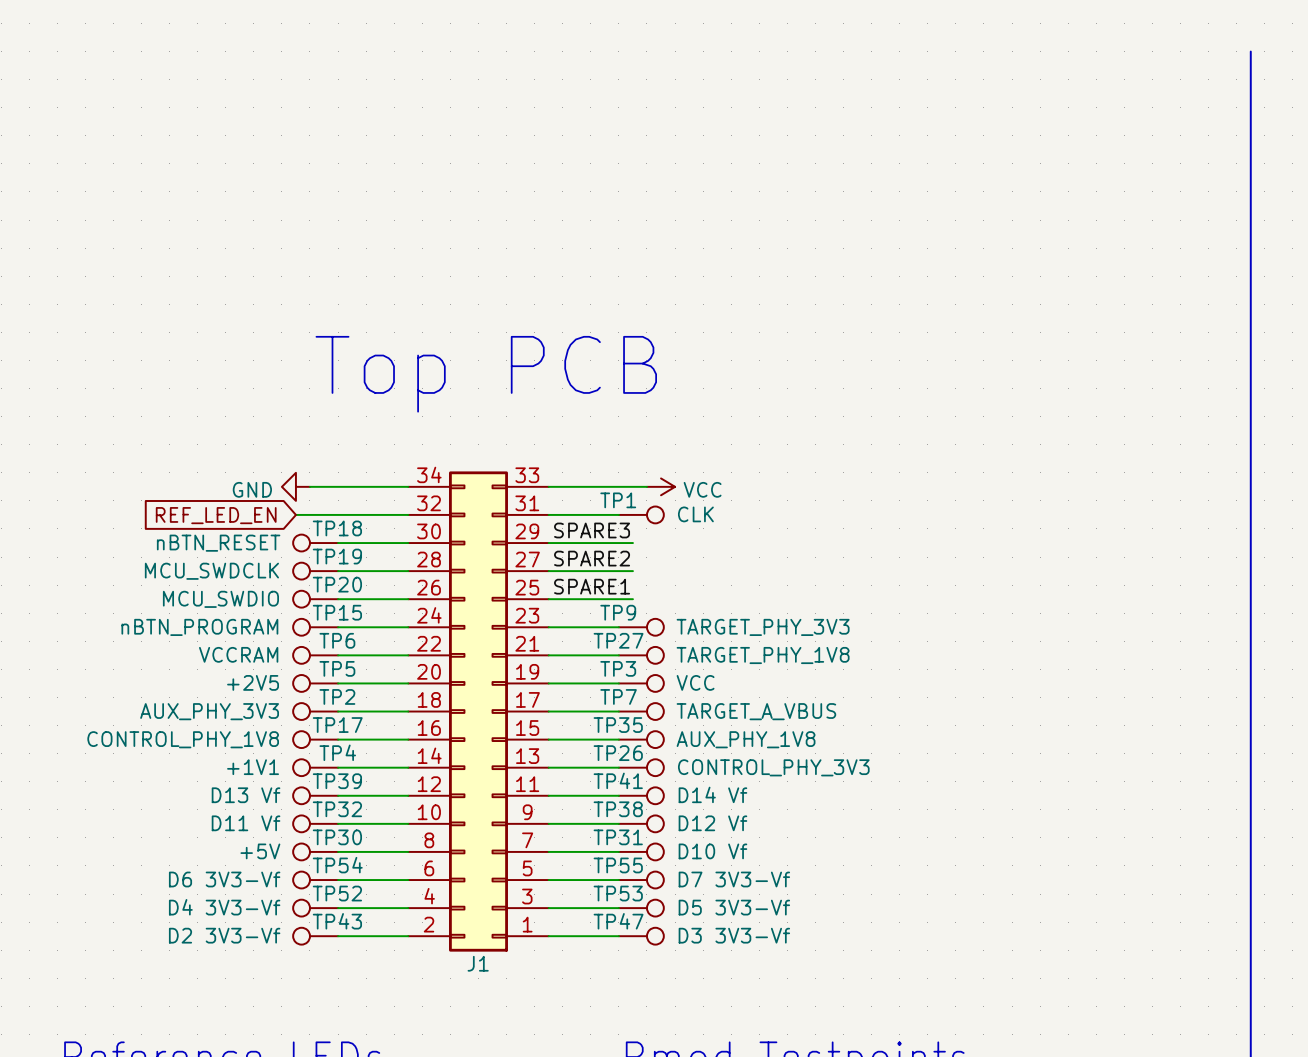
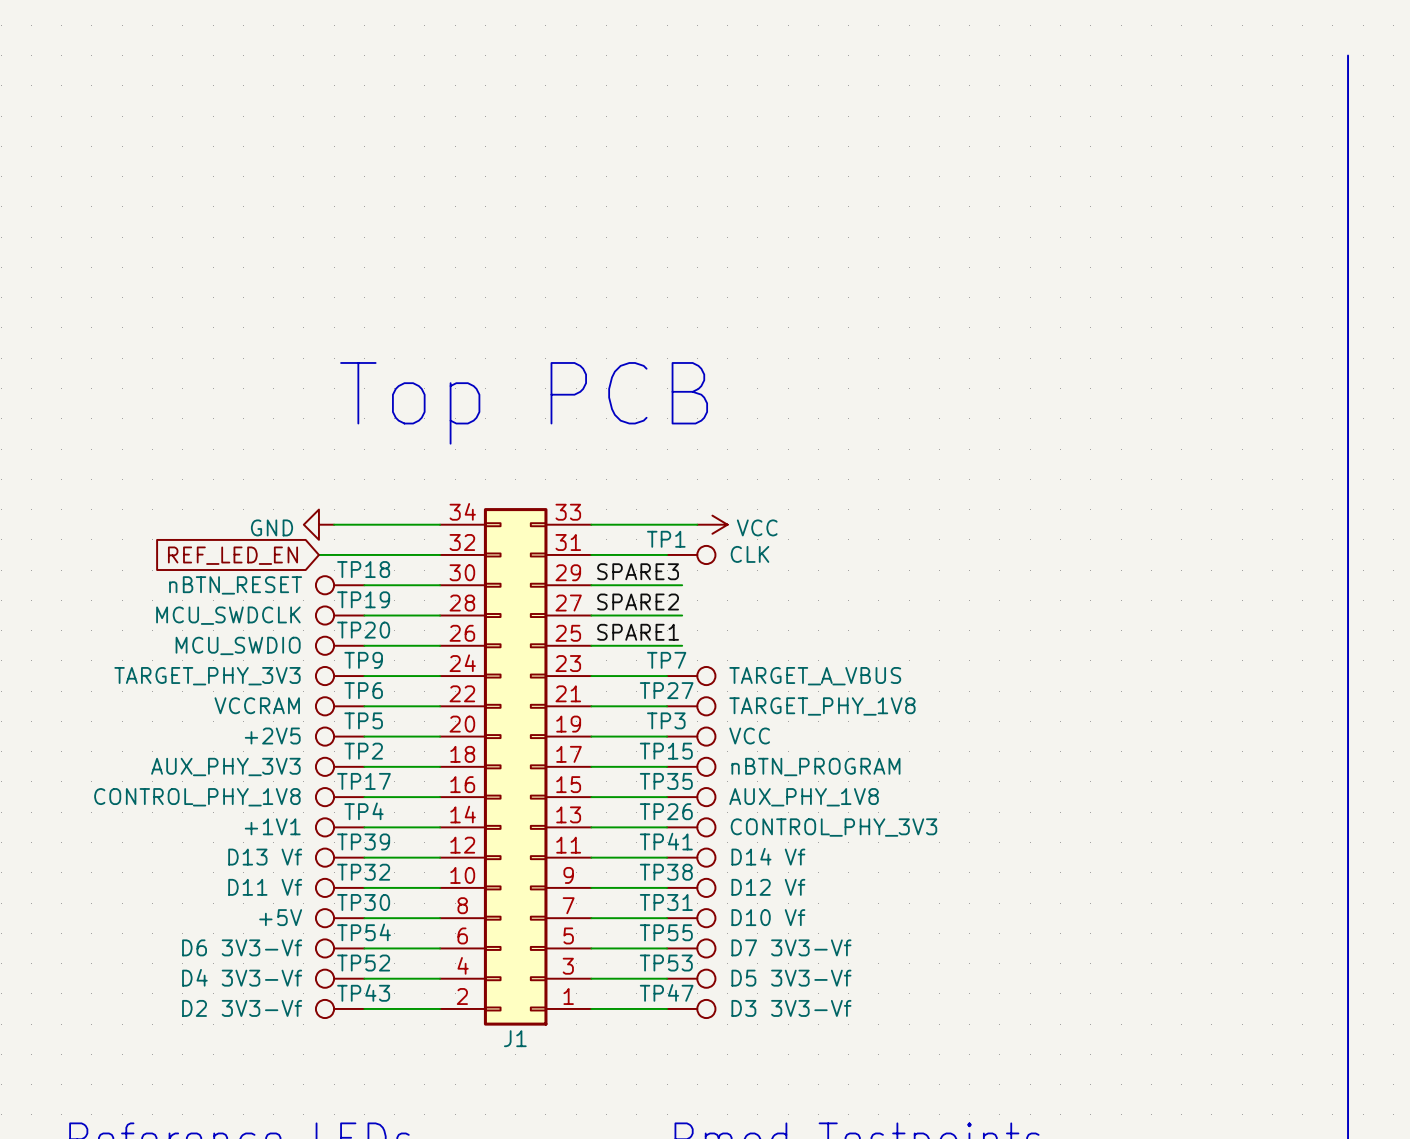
TP15 name: TP15 (337, 612) -> TP9 (363, 660)
TP9 name: TP9 (618, 612) -> TP7 (666, 660)
TP15 value: nBTN_PROGRAM (199, 627) -> TARGET_PHY_3V3 (207, 676)
TP9 value: TARGET_PHY_3V3 (763, 627) -> TARGET_A_VBUS (815, 676)
TP7 name: TP7 (618, 696) -> TP15 (666, 751)
TP7 value: TARGET_A_VBUS (756, 711) -> nBTN_PROGRAM (815, 767)

